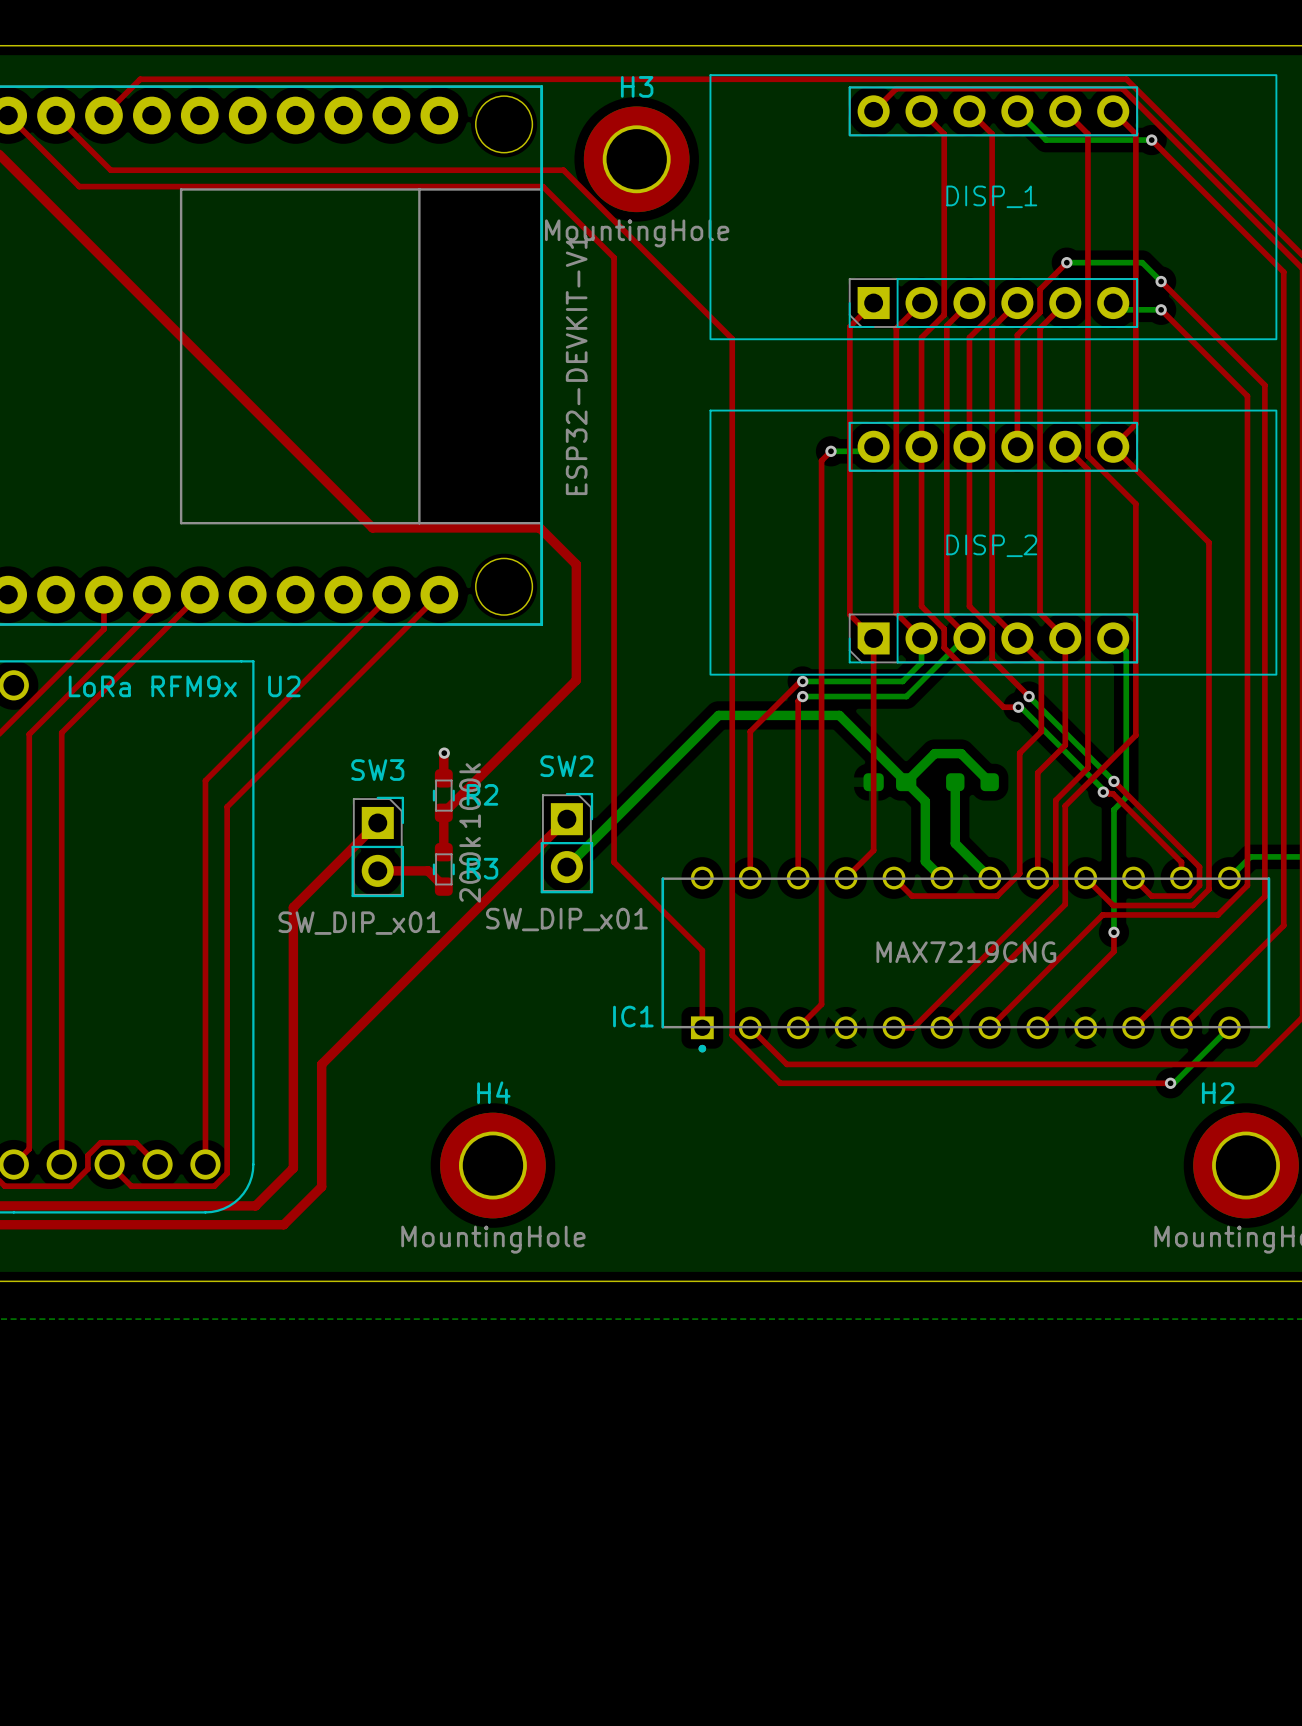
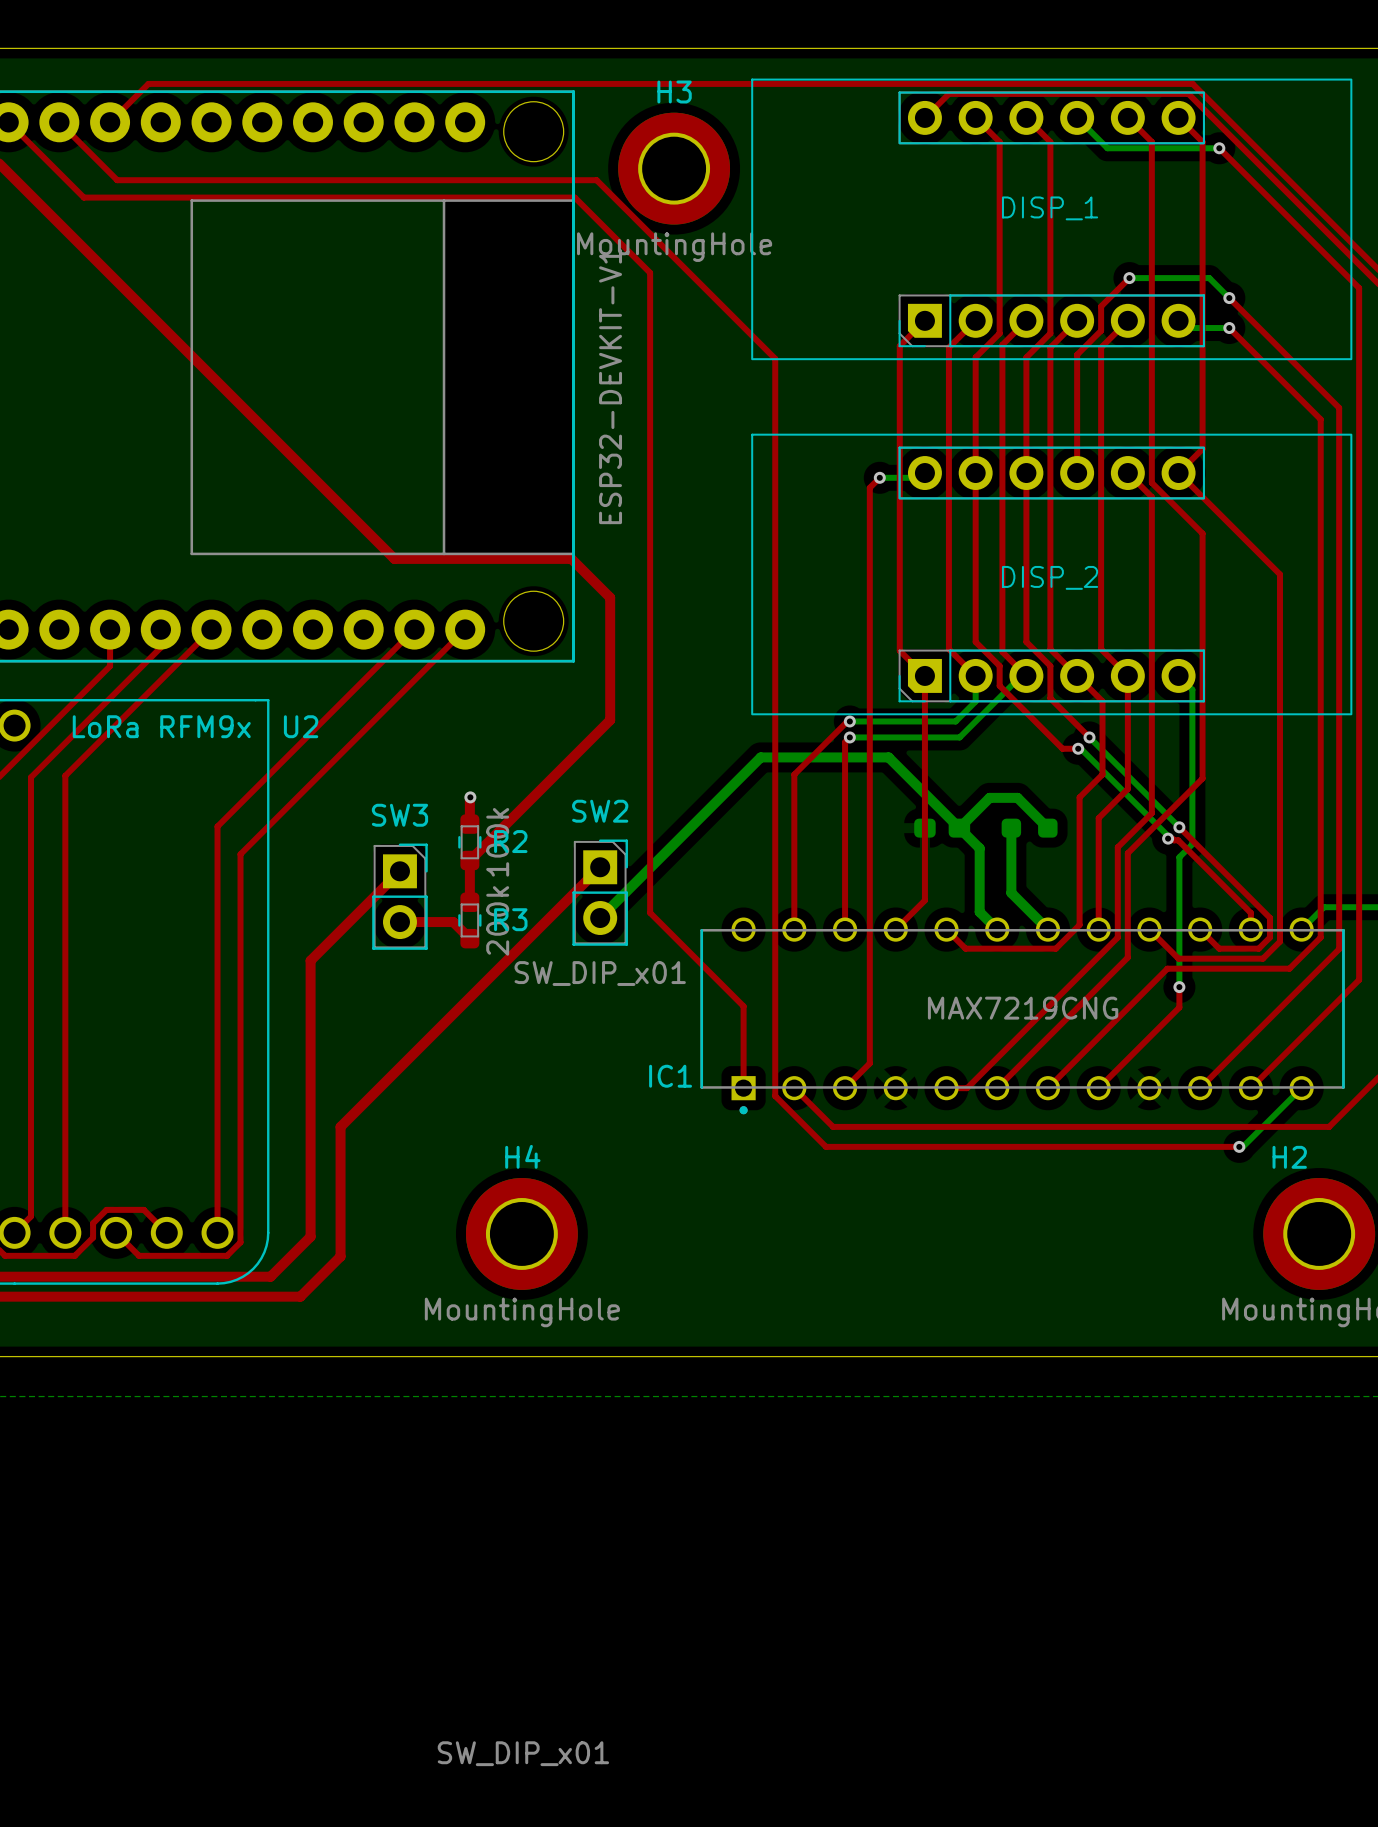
SW3 value position: SW_DIP_x01 (359, 923) -> SW_DIP_x01 (523, 1753)

